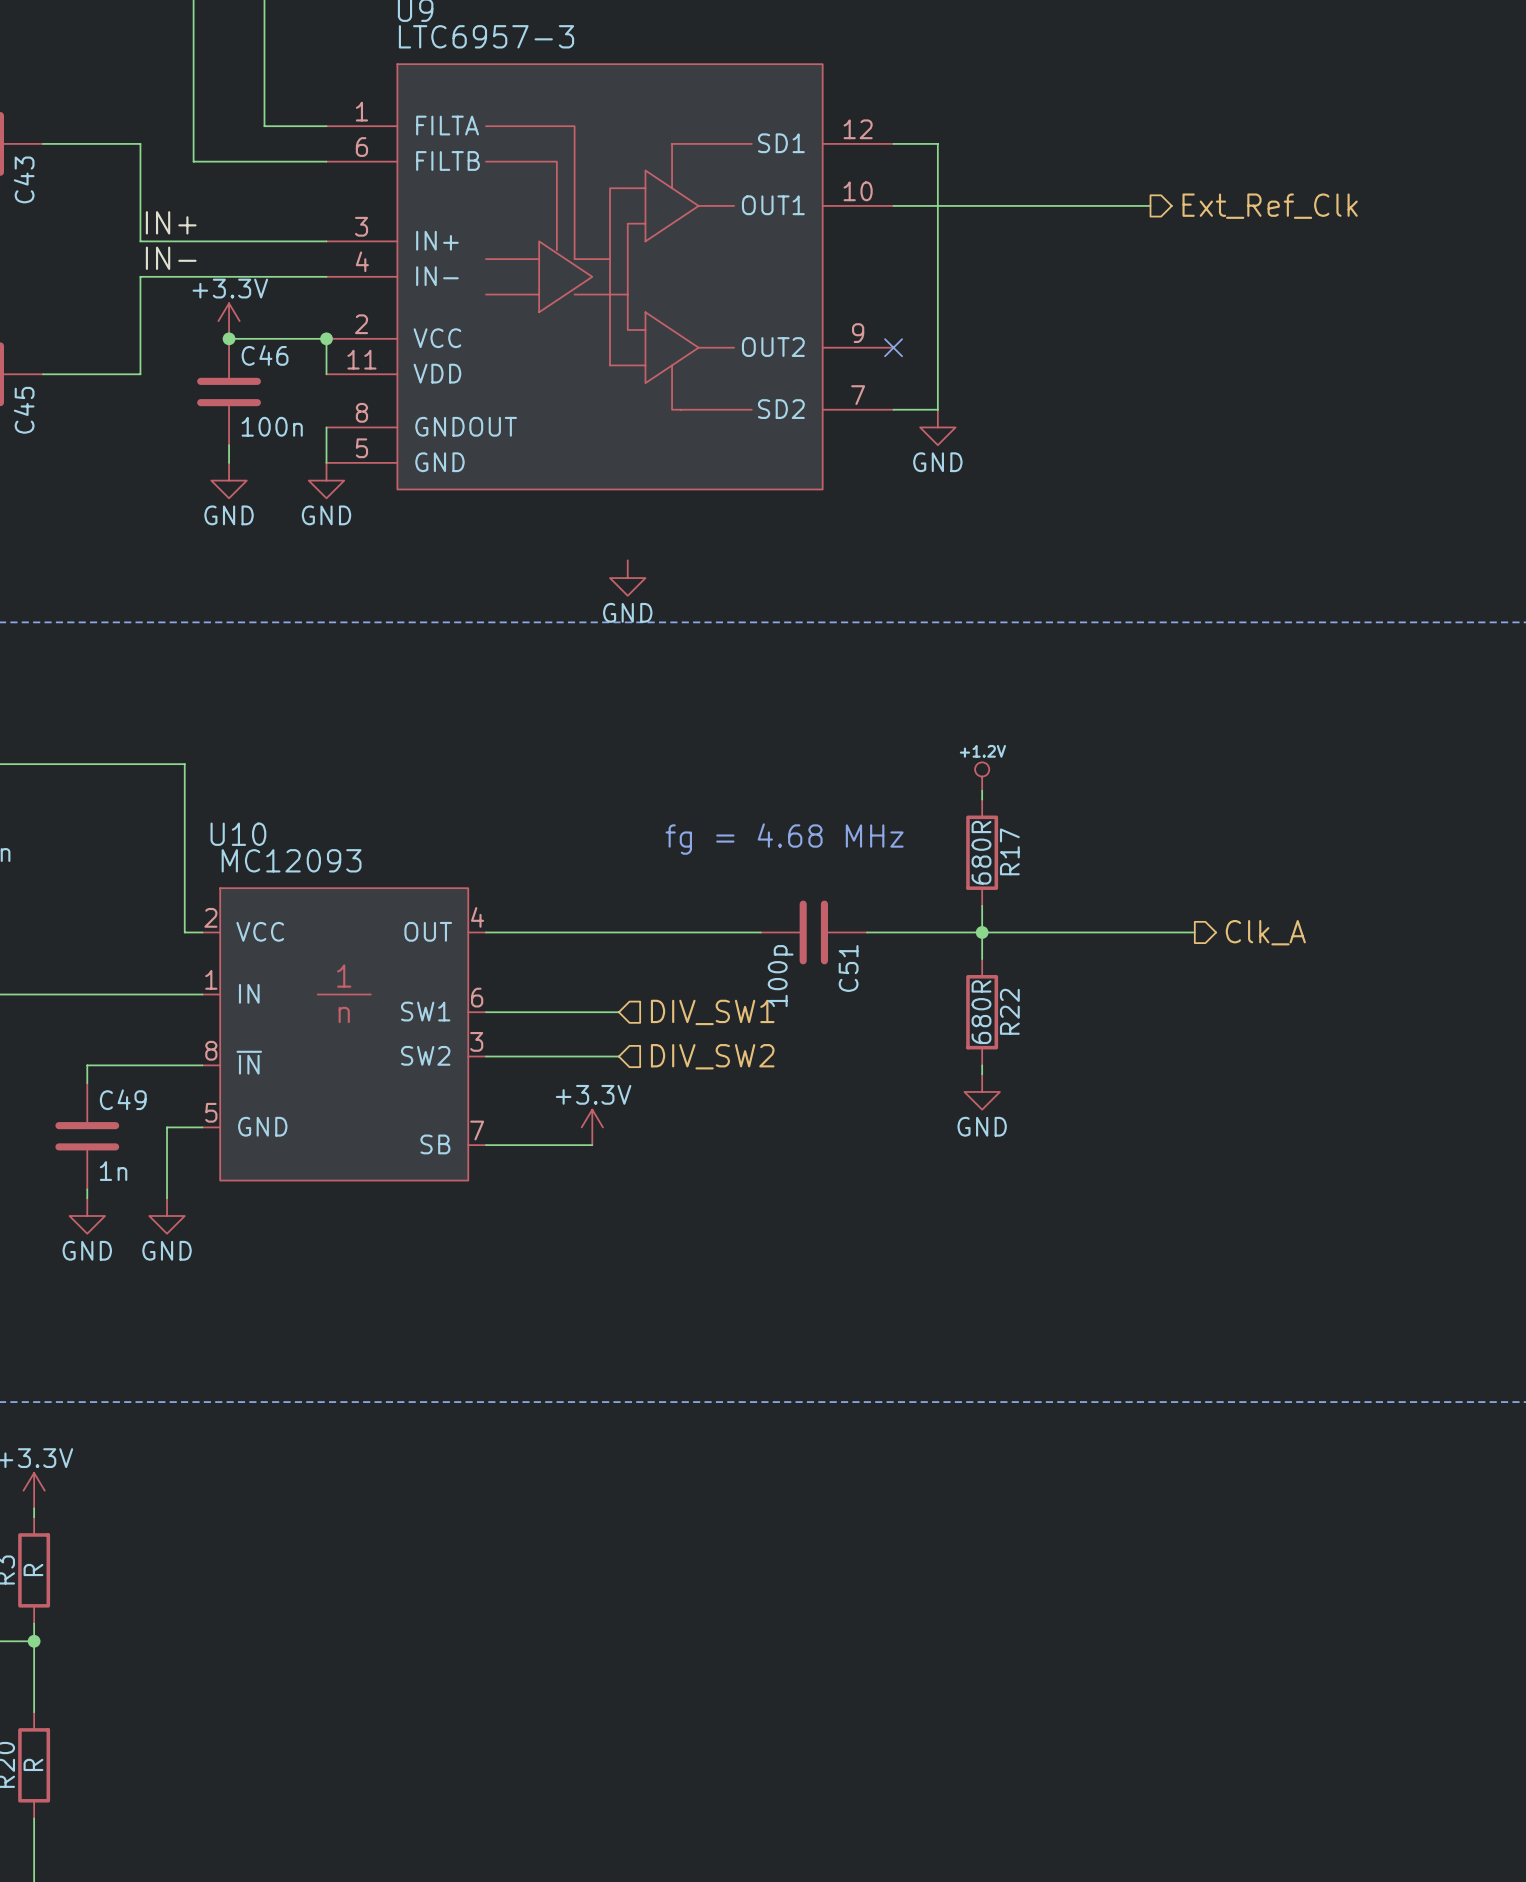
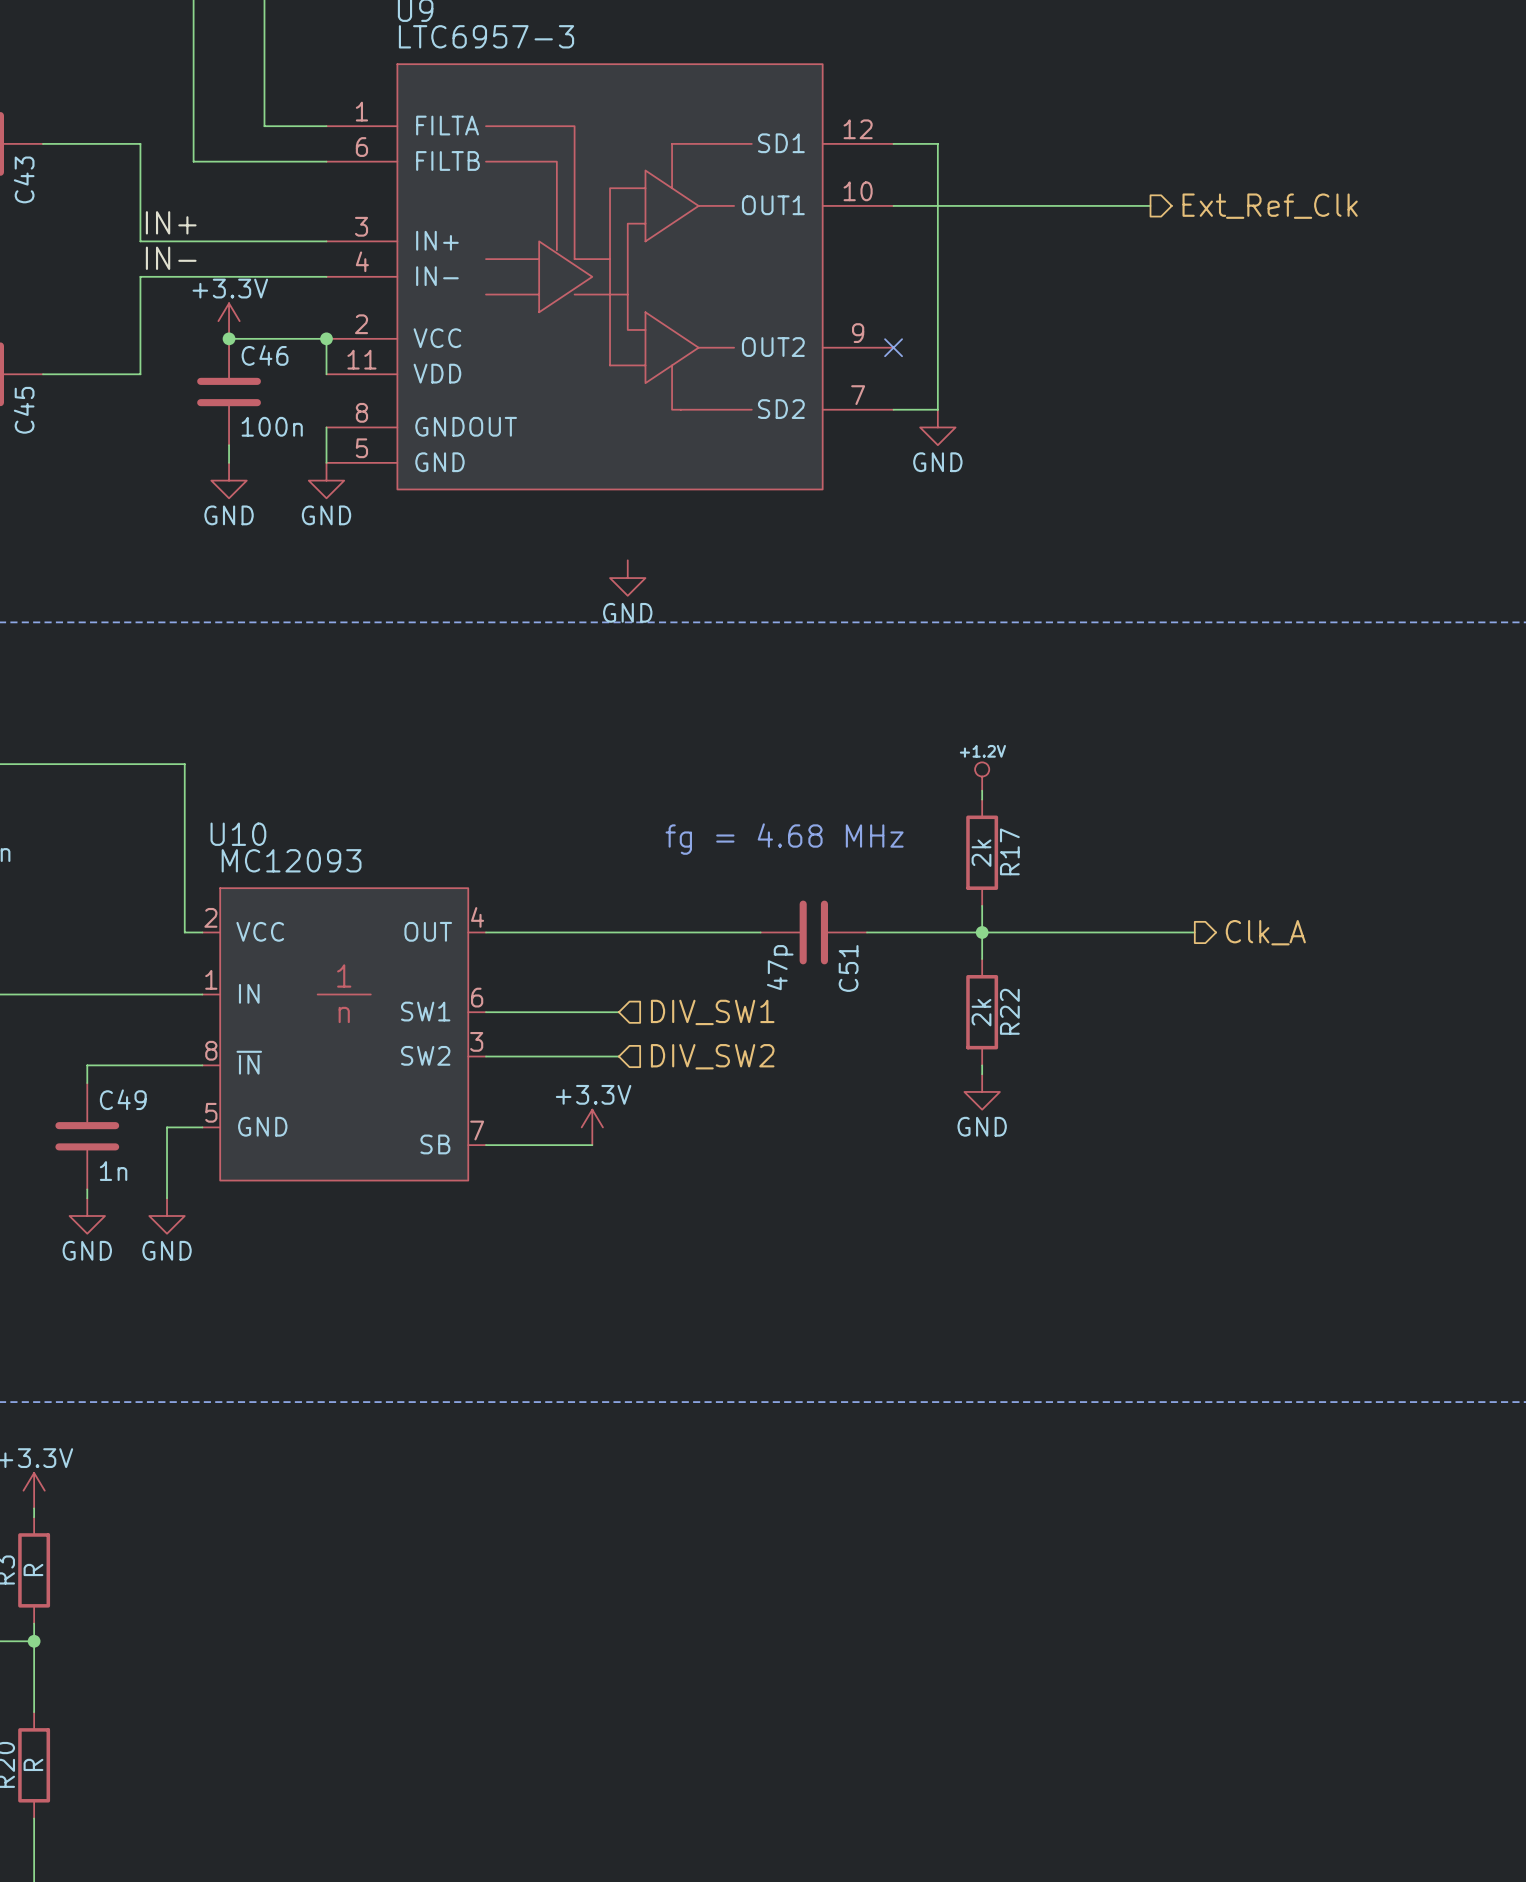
R17 value: 680R (981, 852) -> 2k (981, 853)
C51 value: 100p (780, 976) -> 47p (780, 967)
R22 value: 680R (981, 1012) -> 2k (981, 1012)

